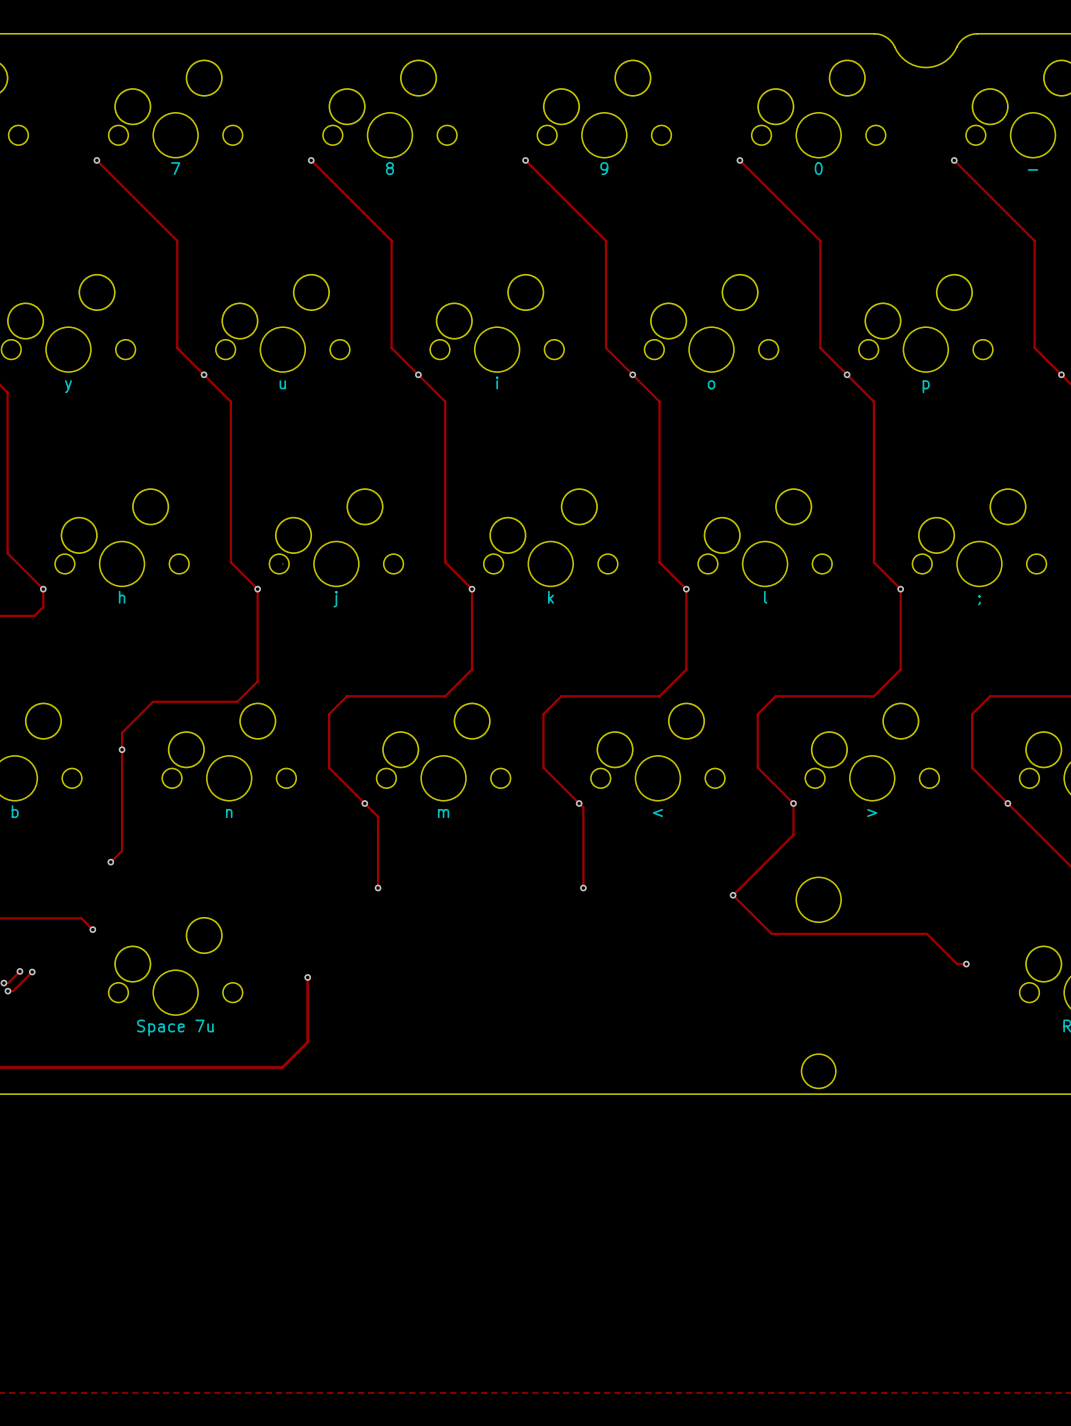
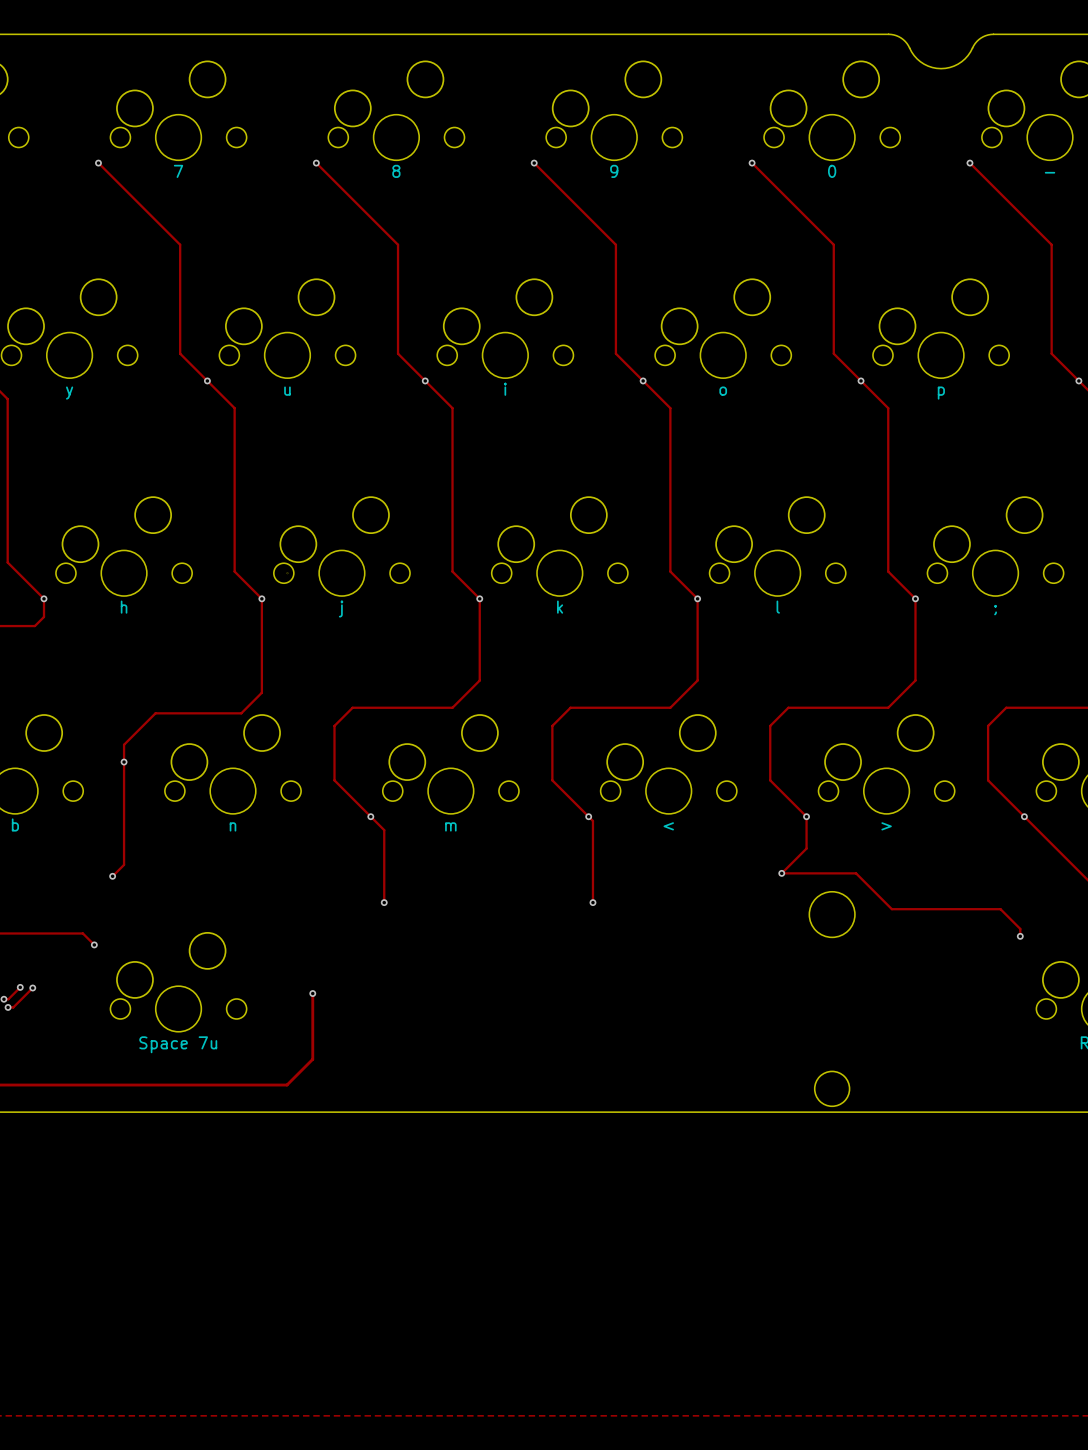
track: none -> (781, 873) (856, 873) (891, 909) (1000, 909) (1020, 928) (1020, 936)
track: (767, 860) (733, 895) (771, 933) (926, 933) (957, 964) (966, 964) -> none
via position: (733, 895) -> (781, 873)
via position: (966, 964) -> (1020, 936)

